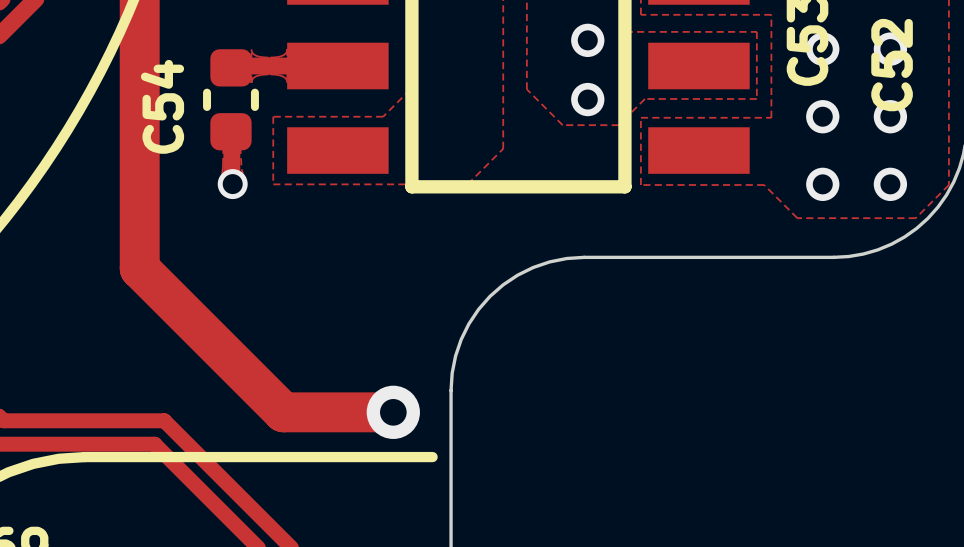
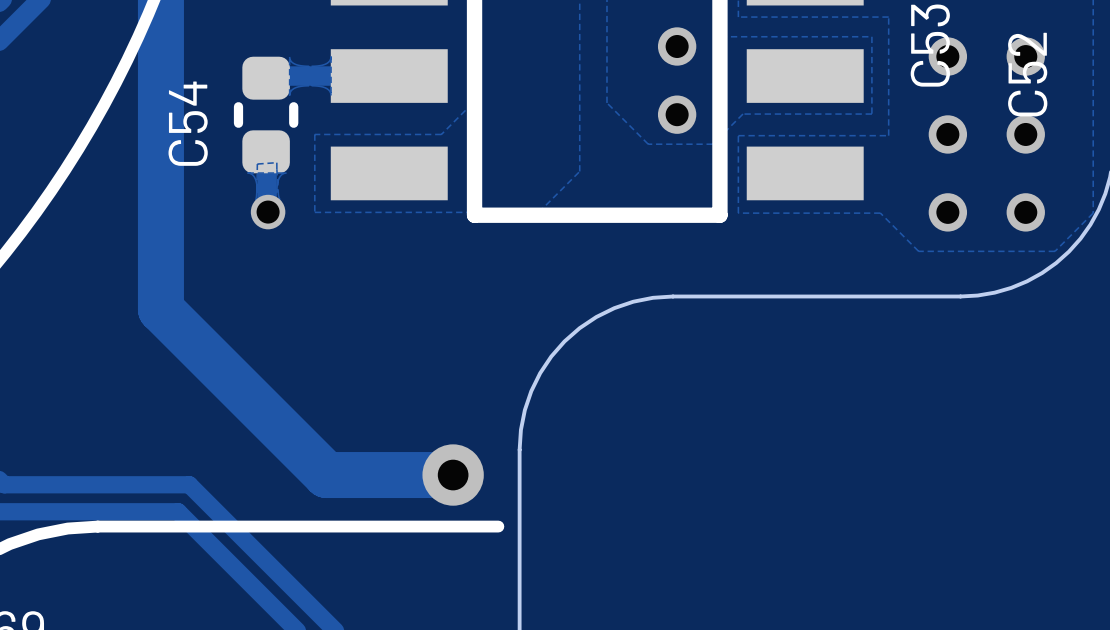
zone outline: none -> (247, 173) (254, 177) (257, 192) (276, 192) (279, 177) (286, 173) (247, 173)

